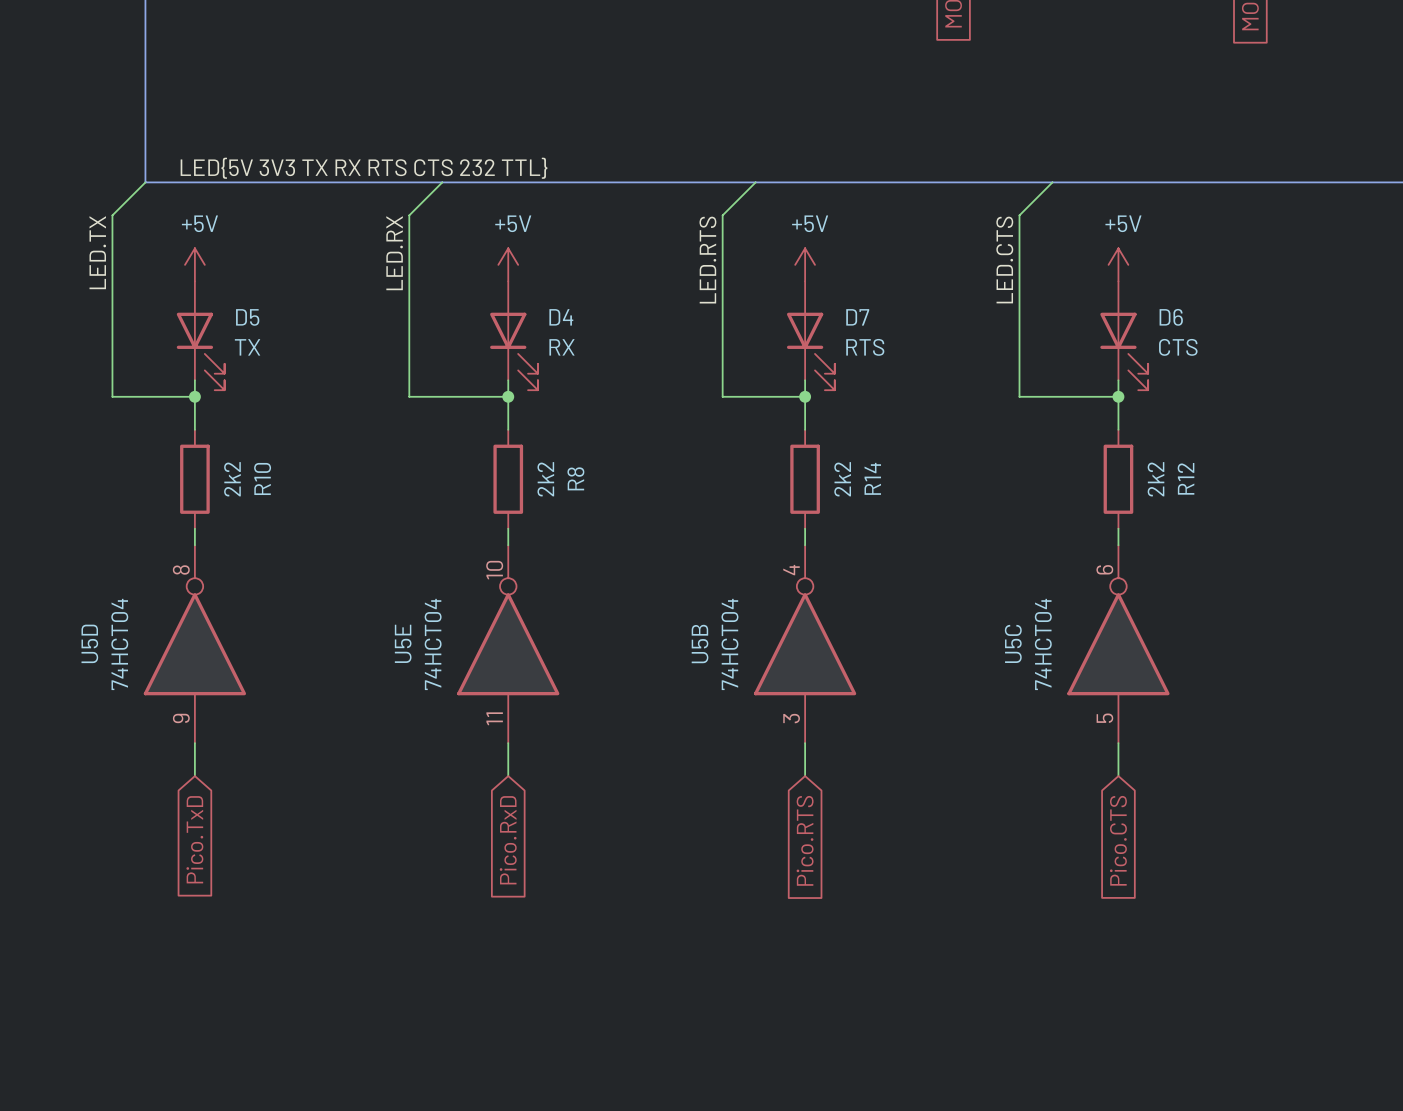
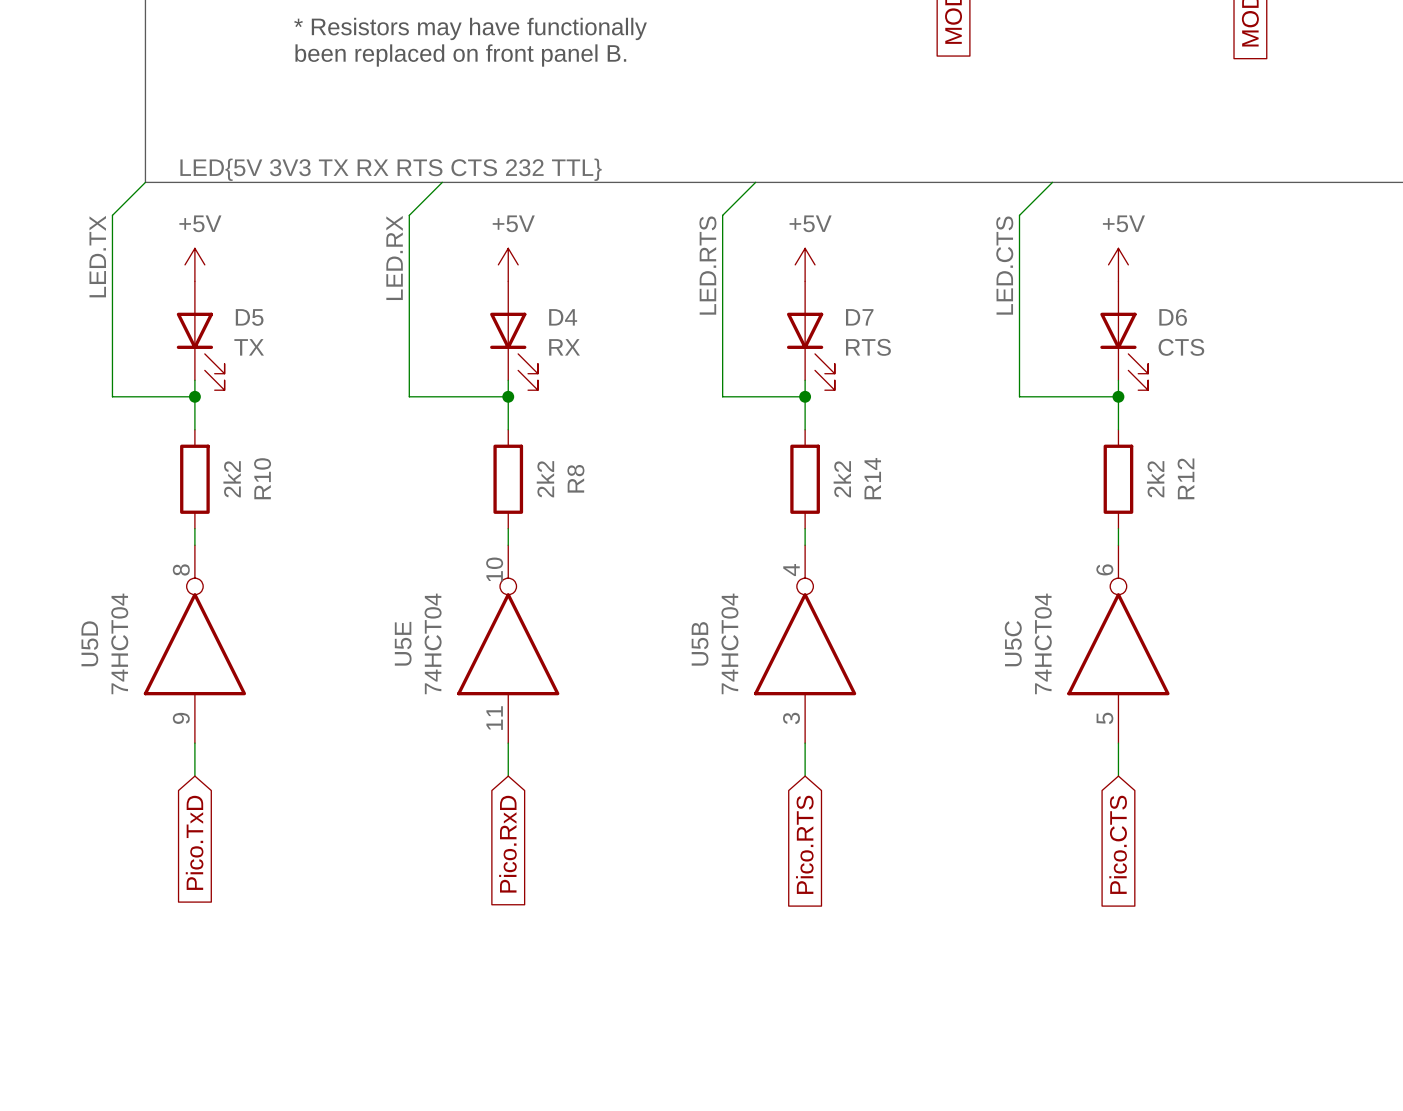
text: none -> * Resistors may have functionally (470, 28)
text: none -> been replaced on front panel B. (460, 55)

